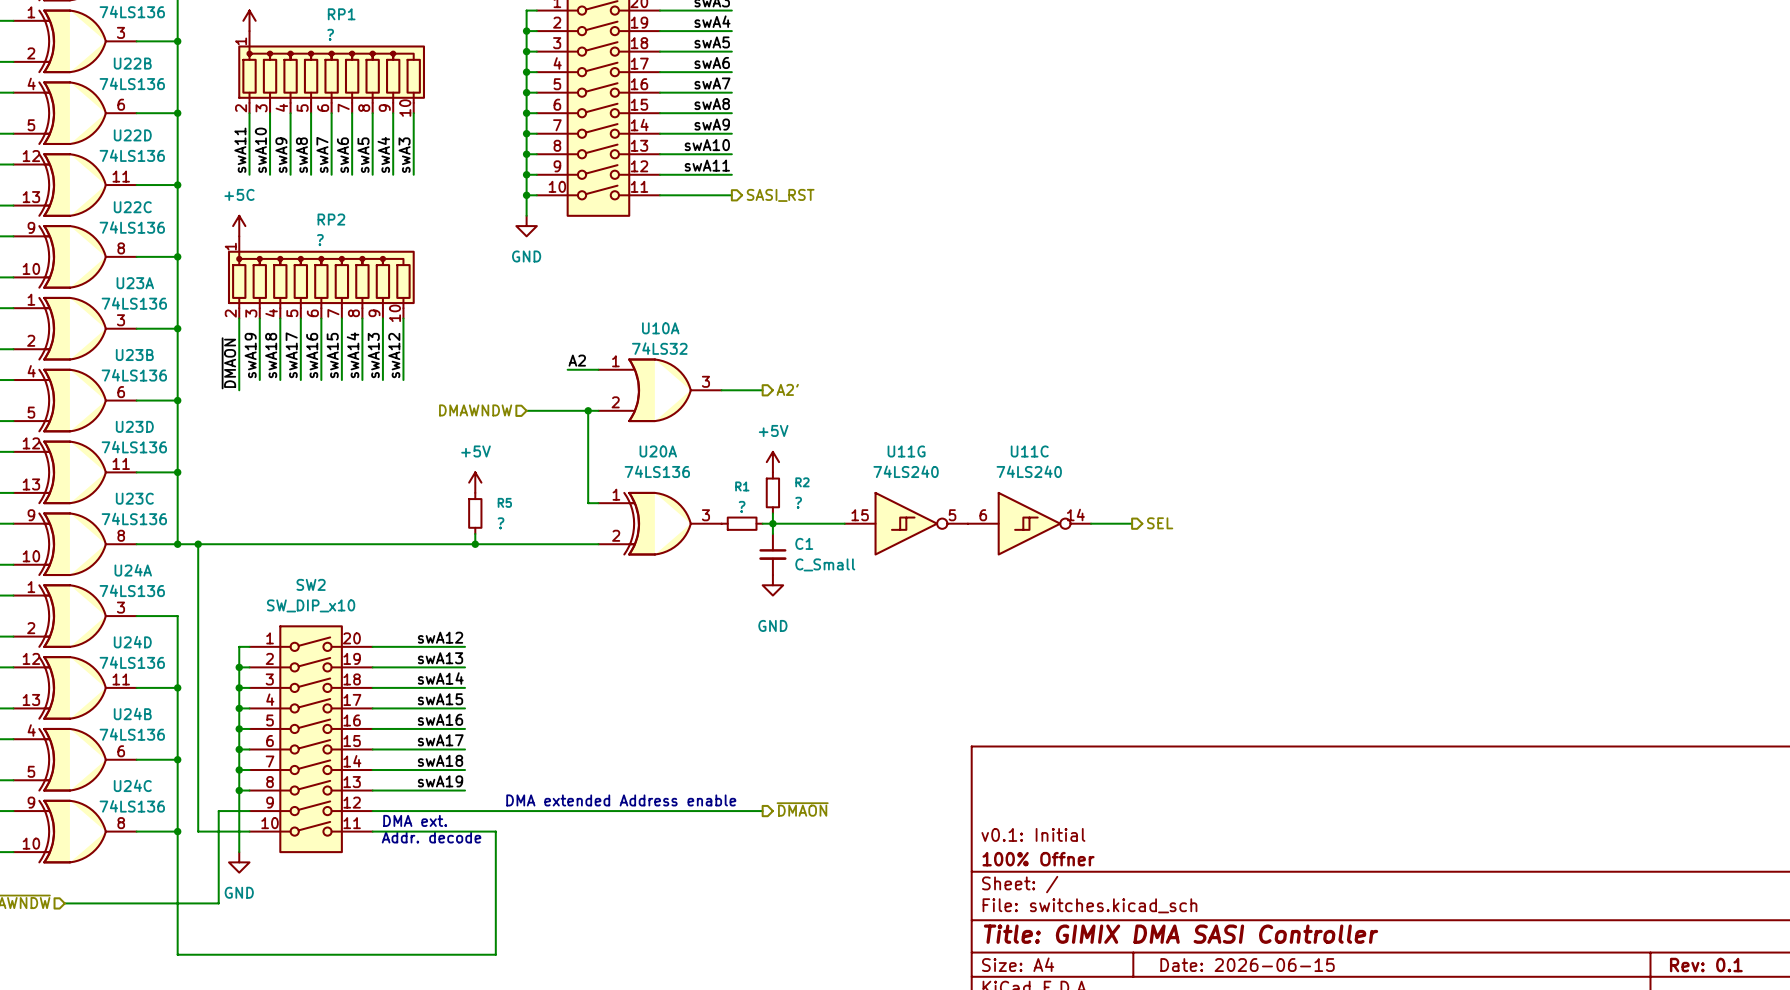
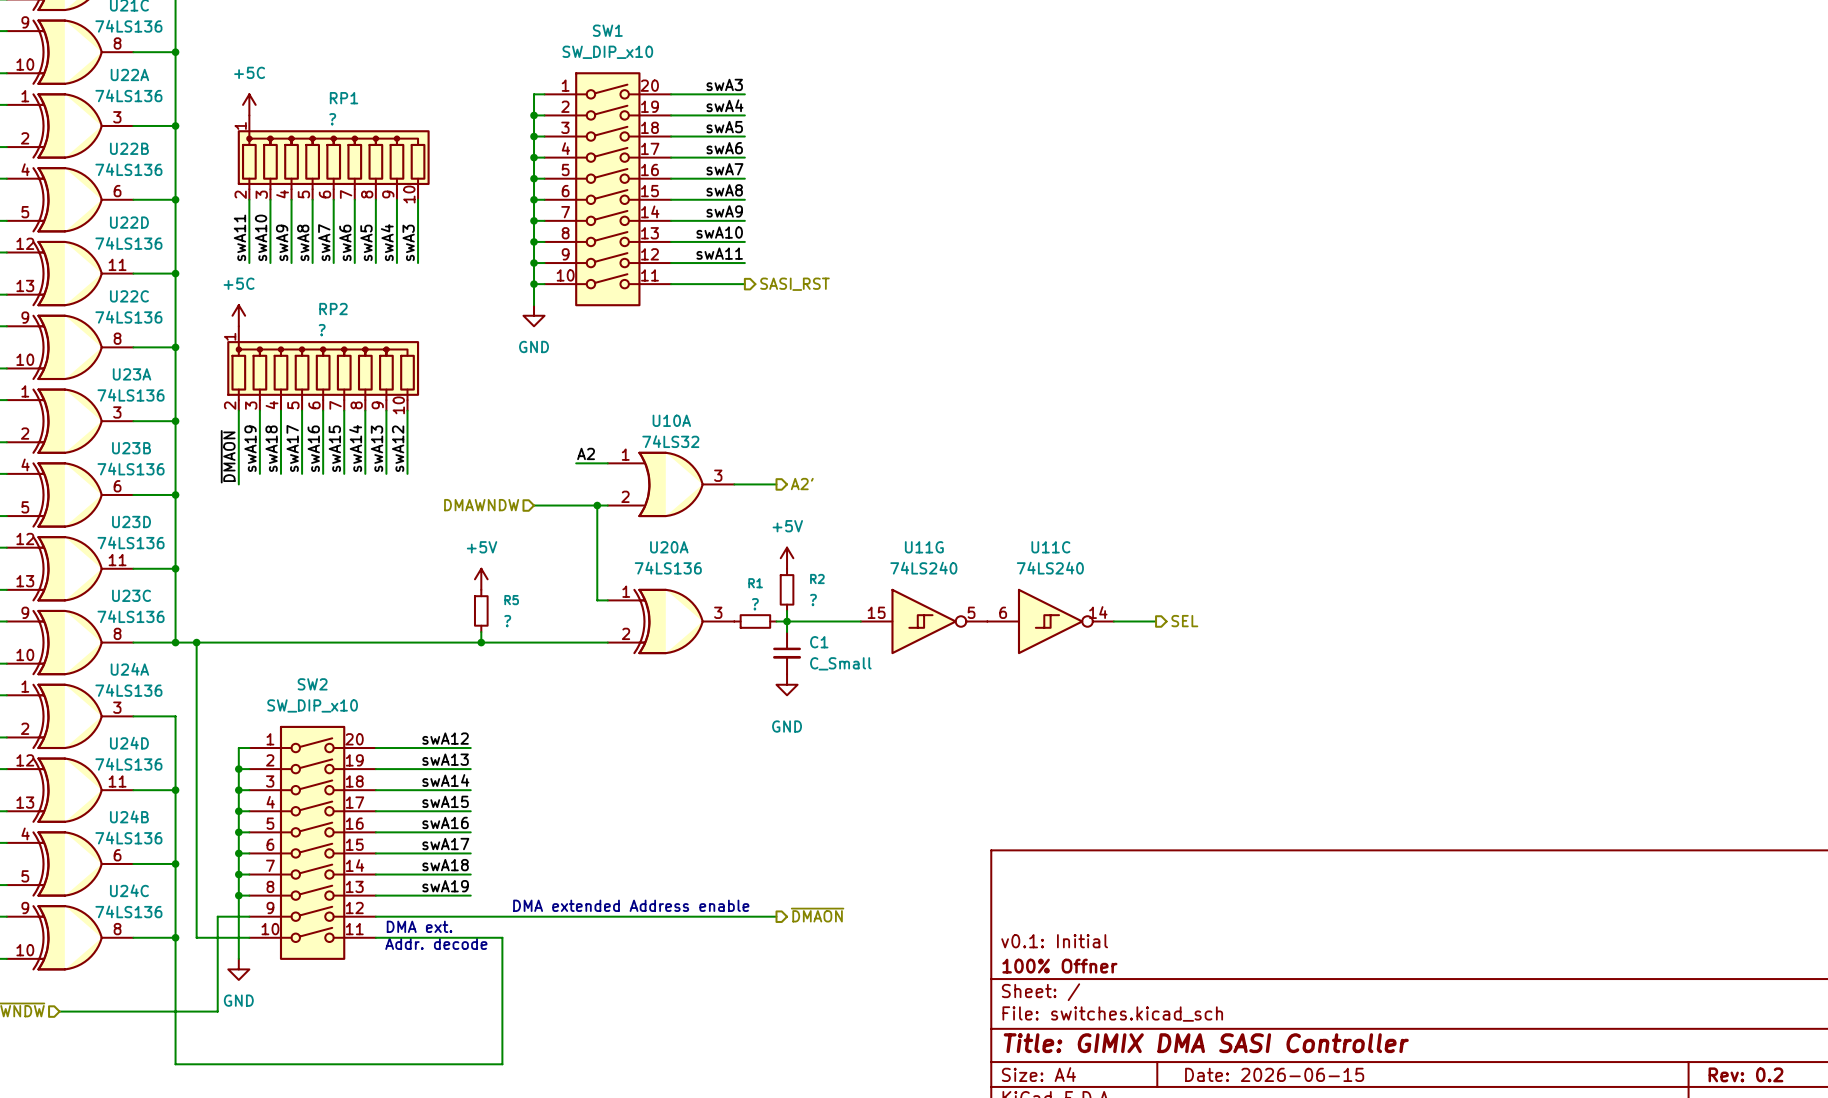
title block: Rev: 0.1 (1706, 965) -> Rev: 0.2 (1745, 1074)

